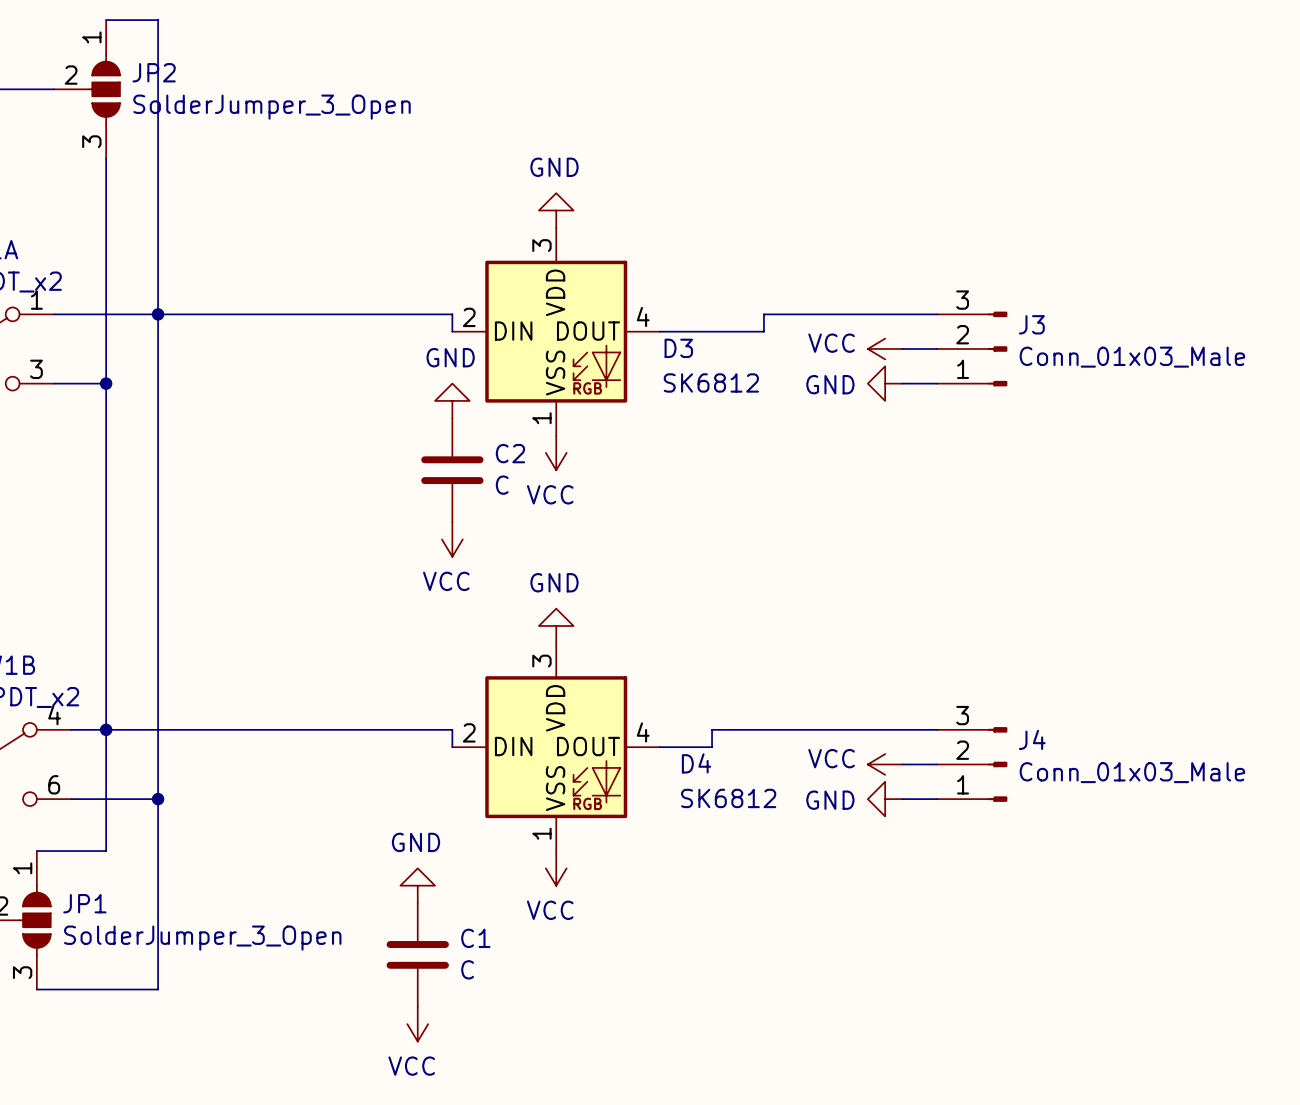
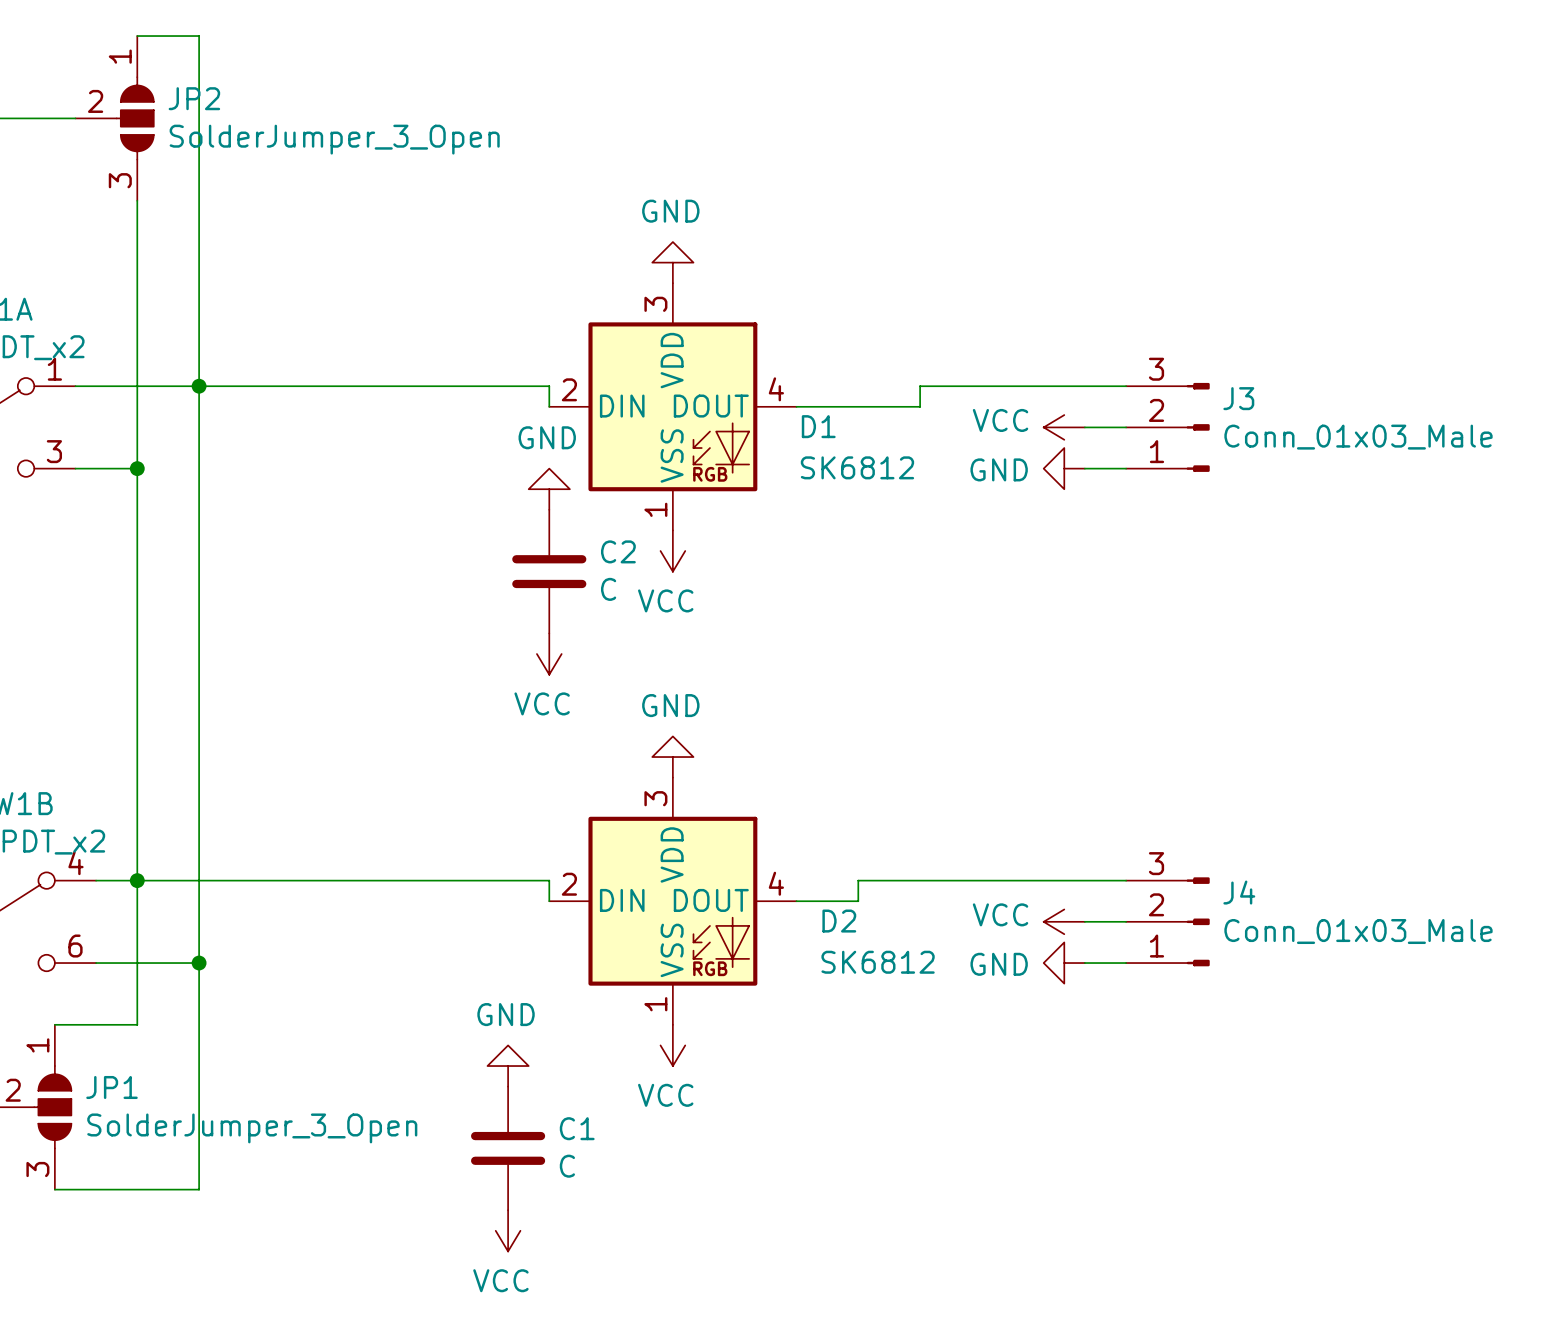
D3 name: D3 (678, 348) -> D1 (818, 426)
D4 name: D4 (696, 763) -> D2 (839, 921)

